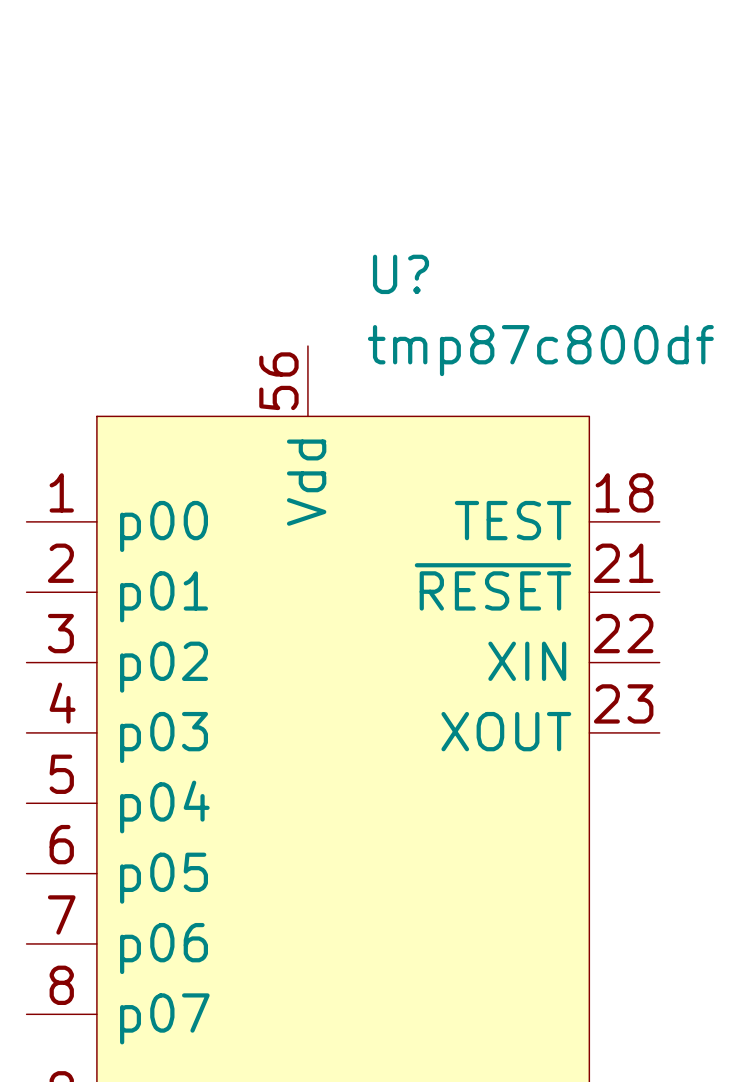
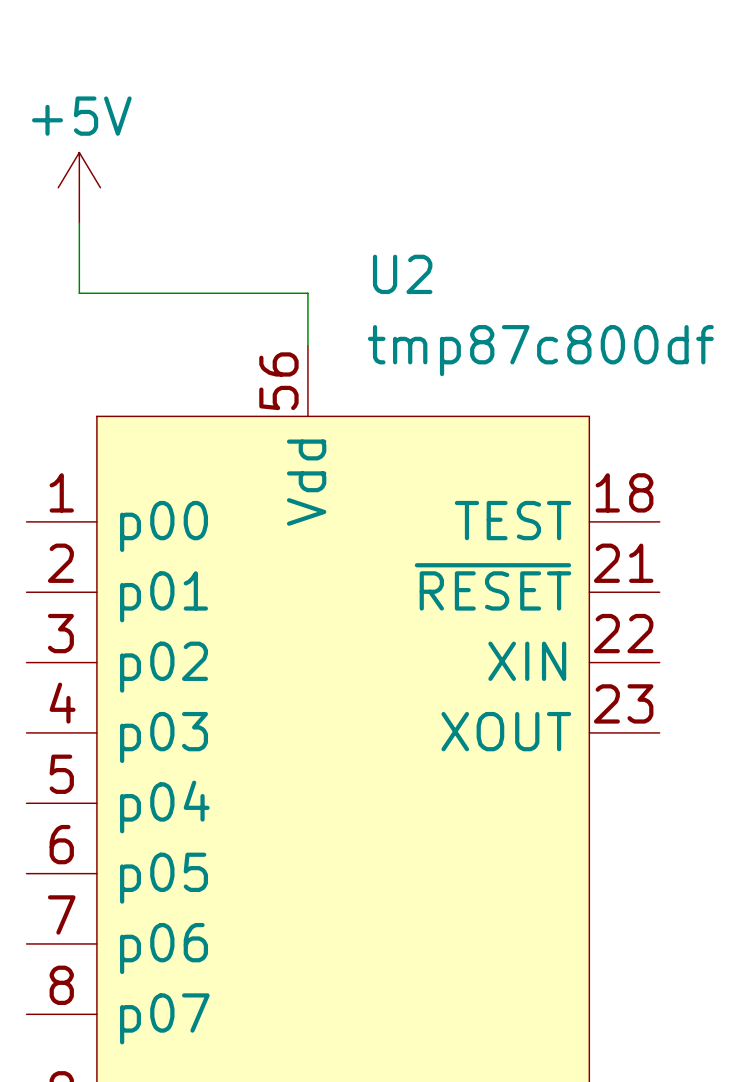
power symbol: none -> +5V (79, 187)
wire: none -> (79, 222) (79, 293) (307, 293) (307, 346)
U? name: U? (401, 274) -> U2 (402, 274)

